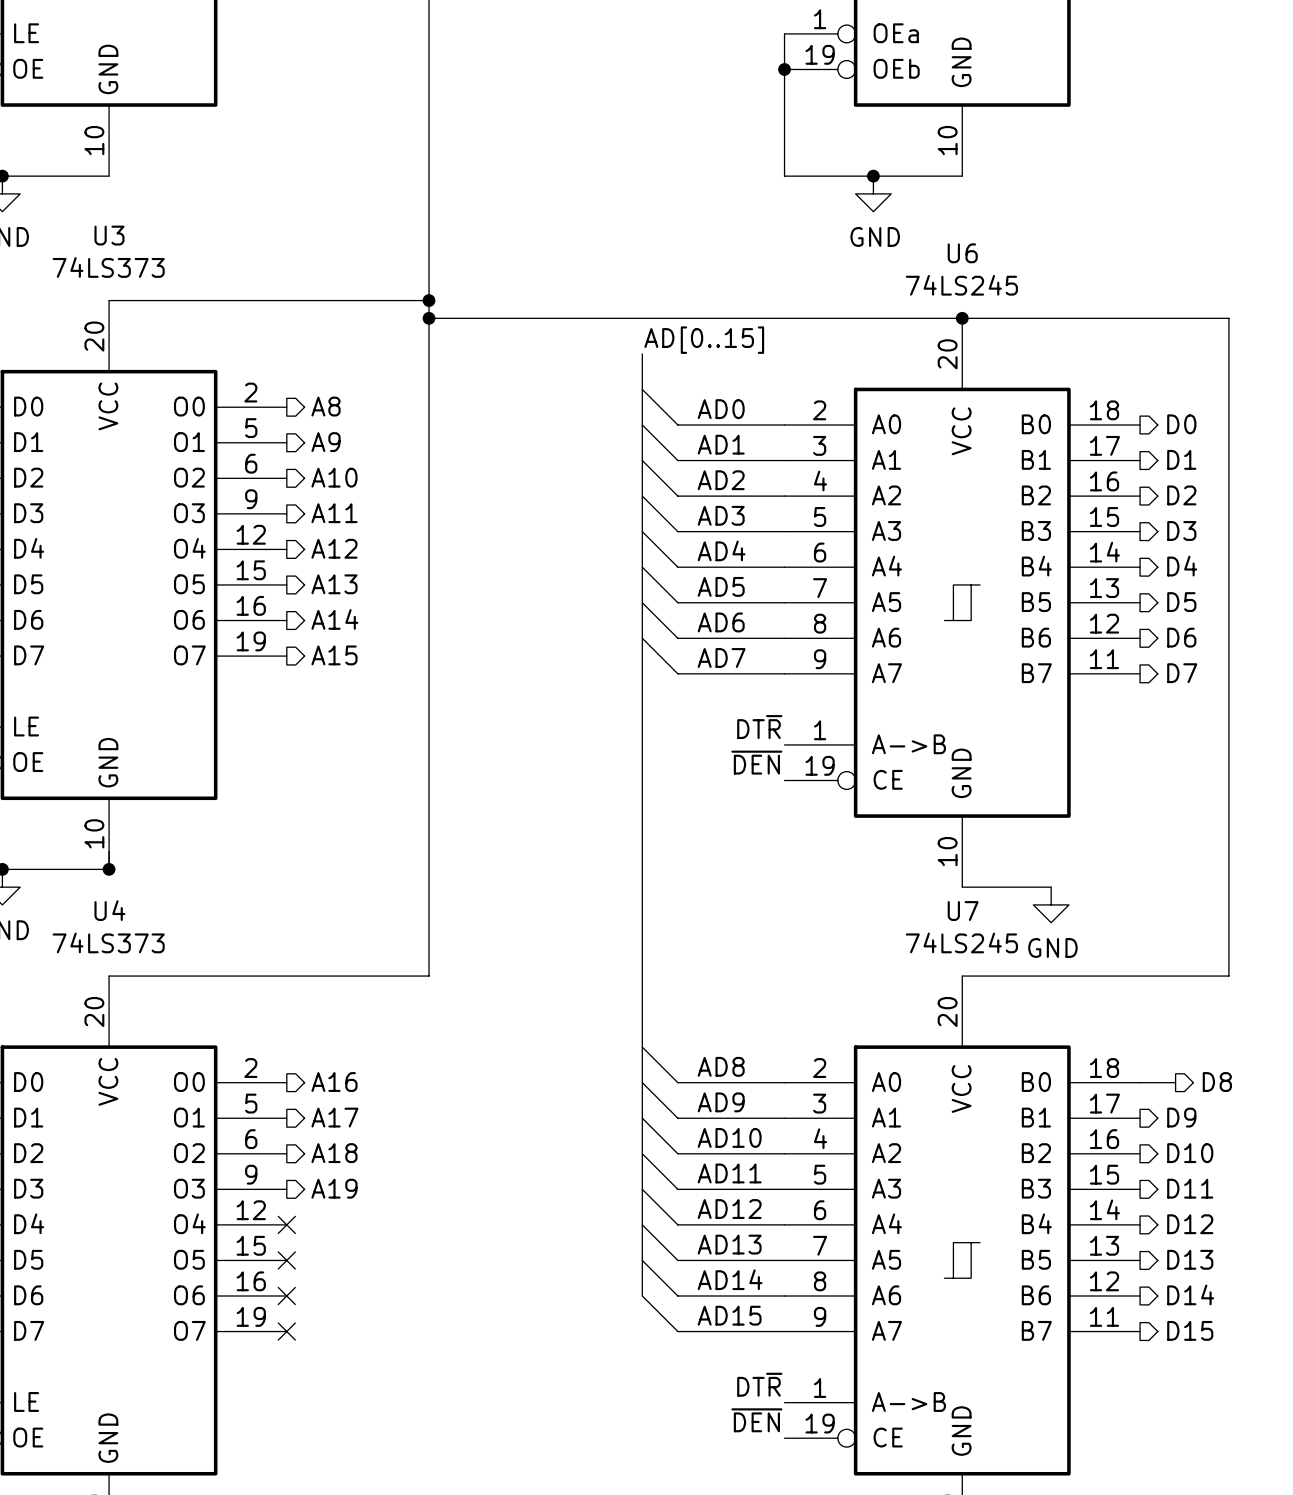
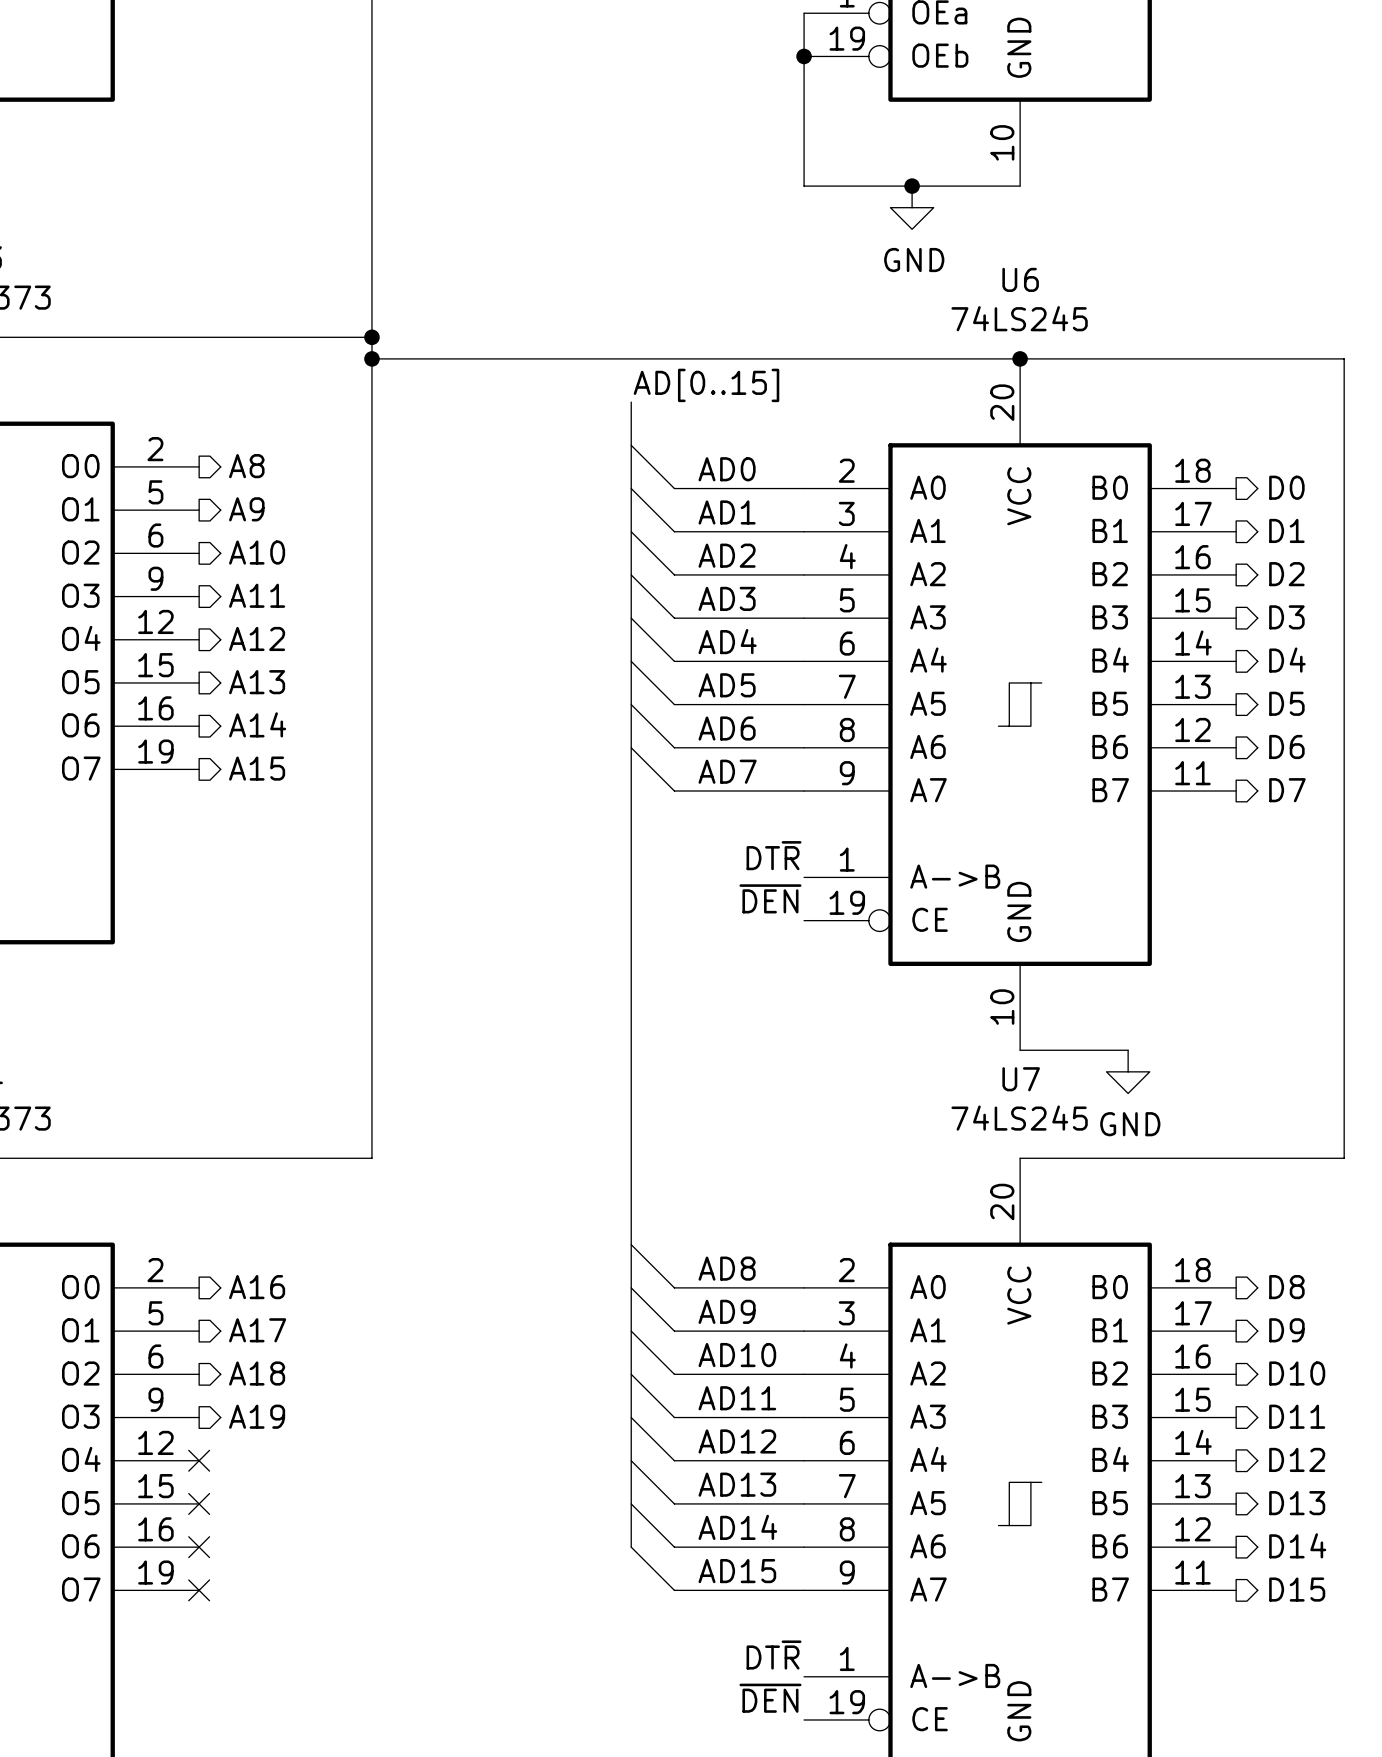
wire: (1140, 1082) (1175, 1082) -> none
hierarchical label position: D8 (1217, 1082) -> D8 (1286, 1287)

